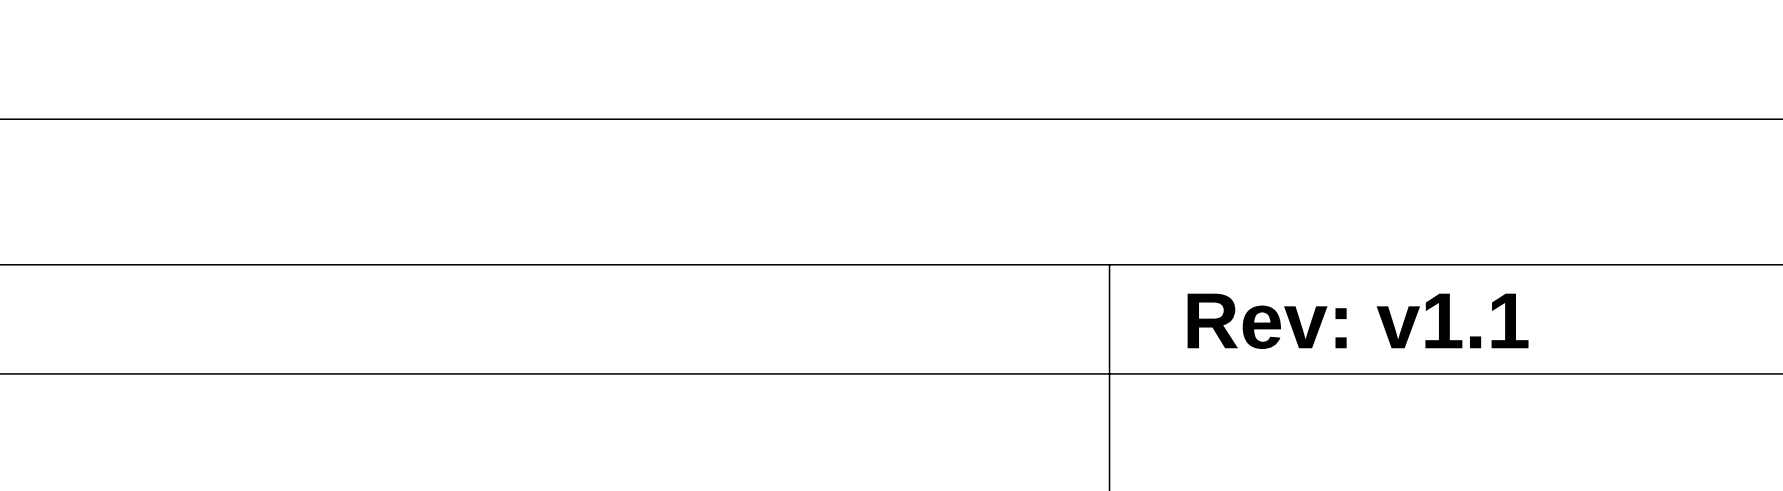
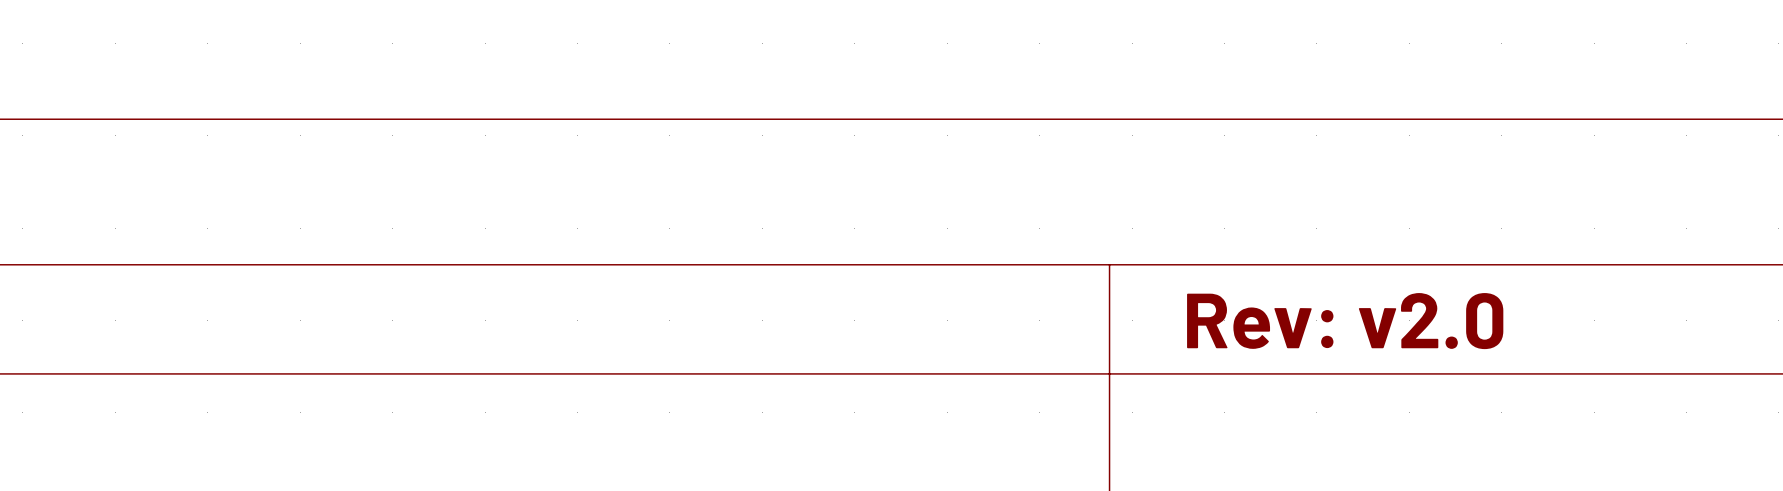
title block: Rev: v1.1 (1358, 321) -> Rev: v2.0 (1345, 321)

